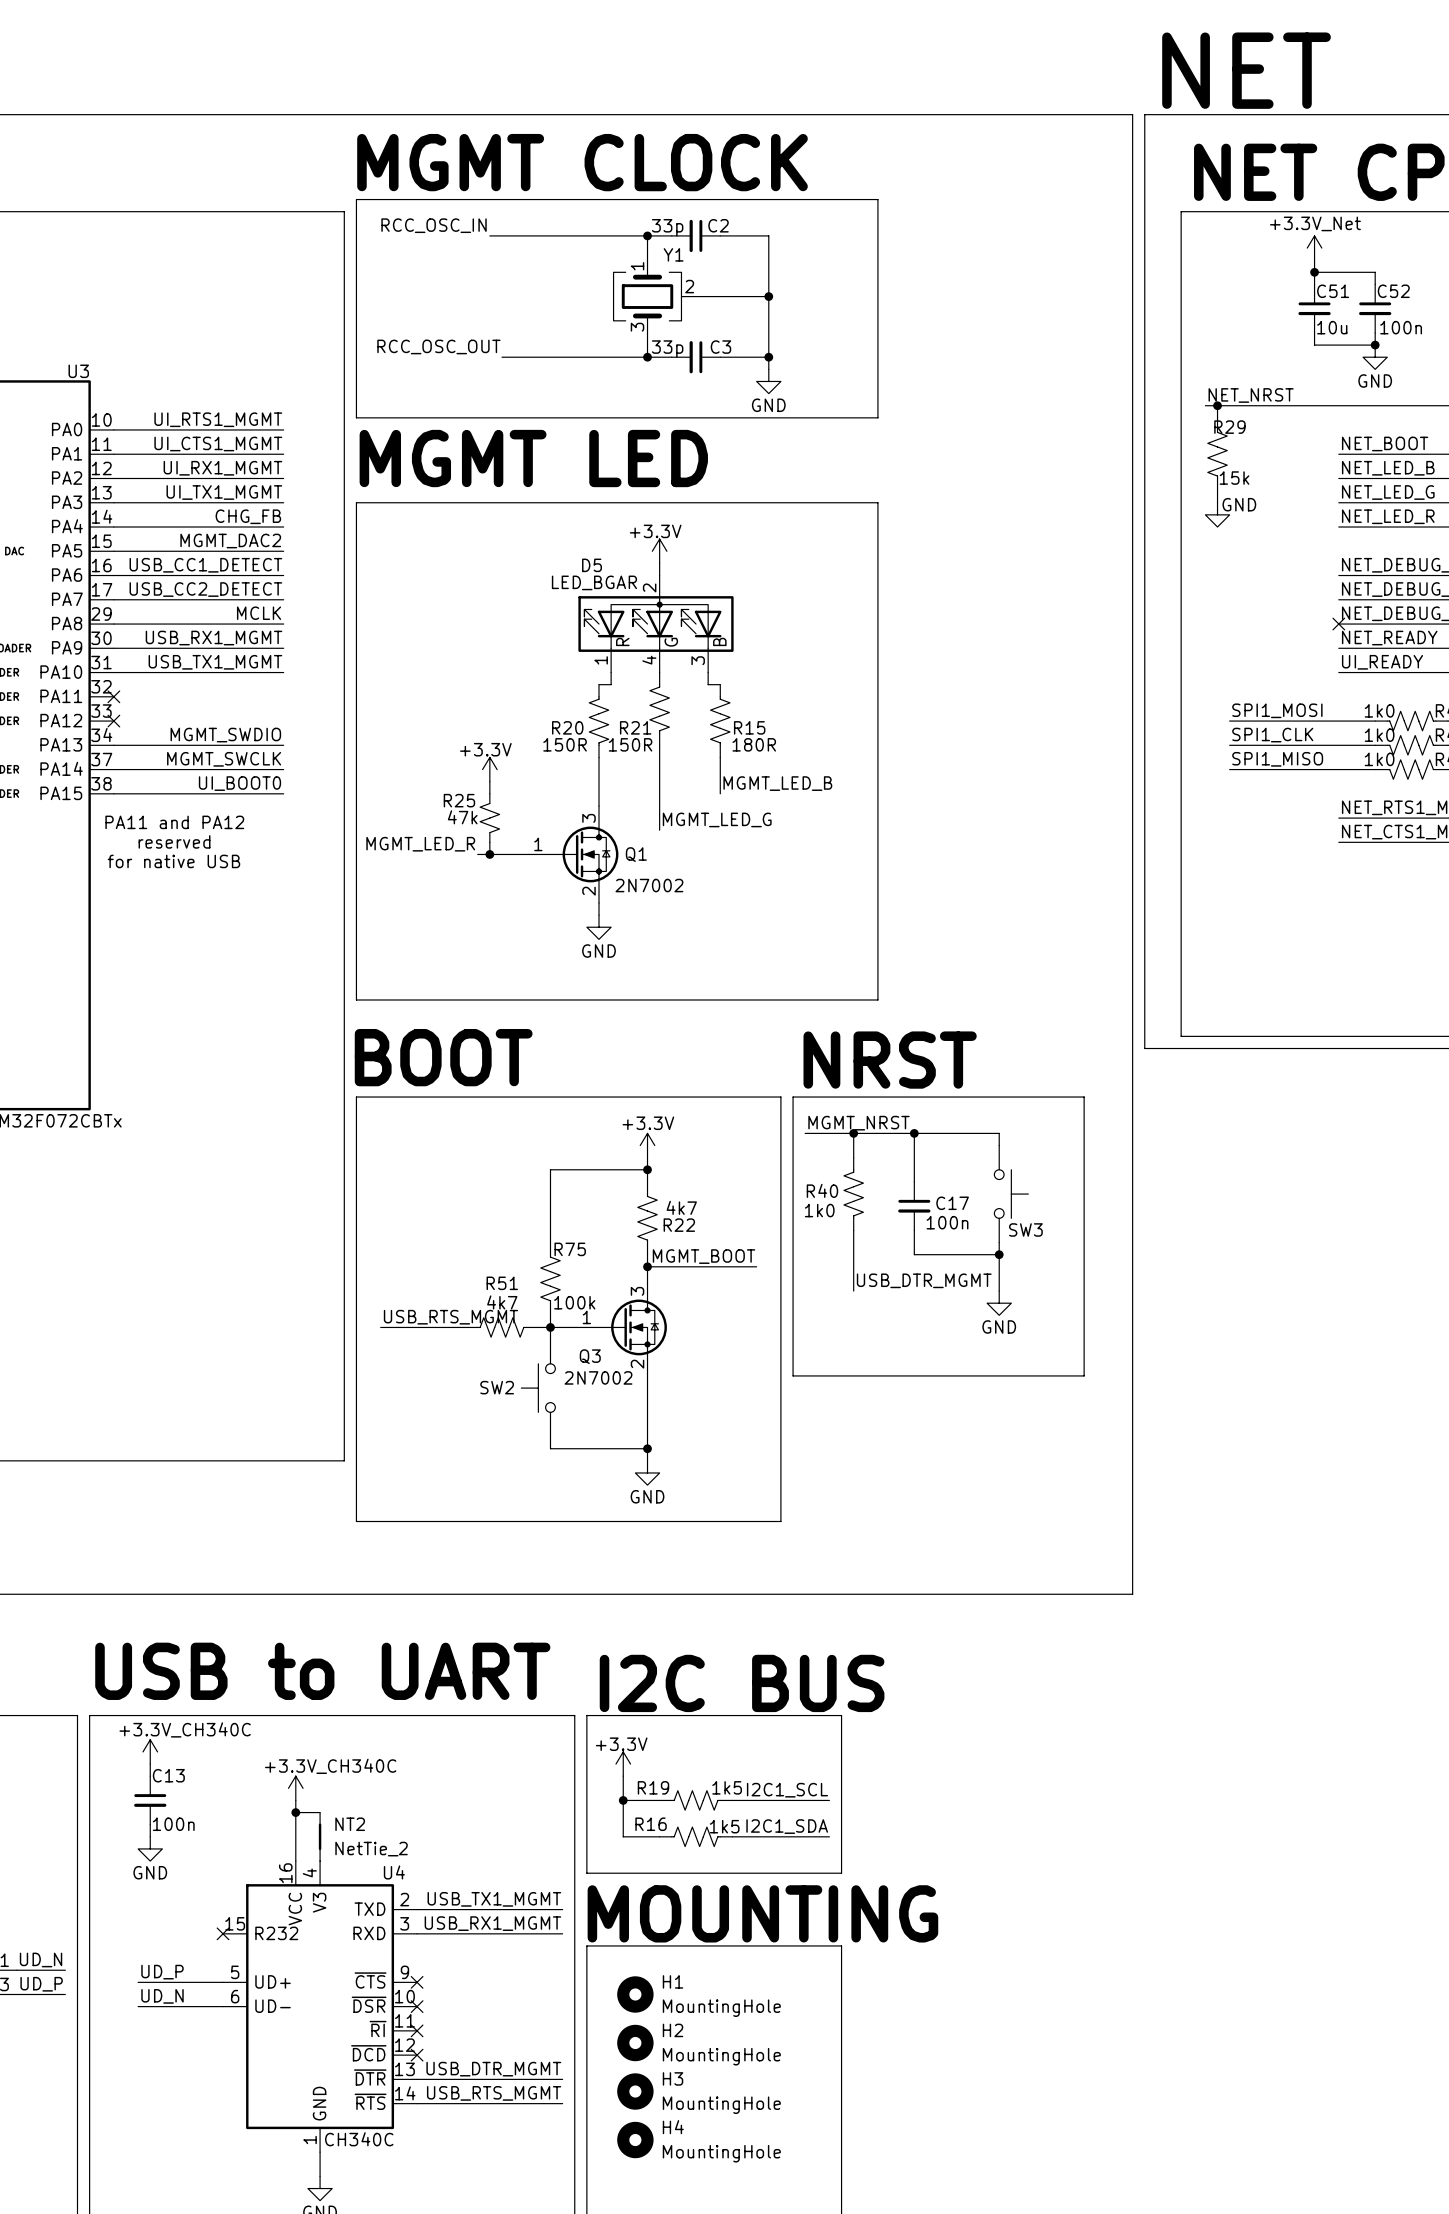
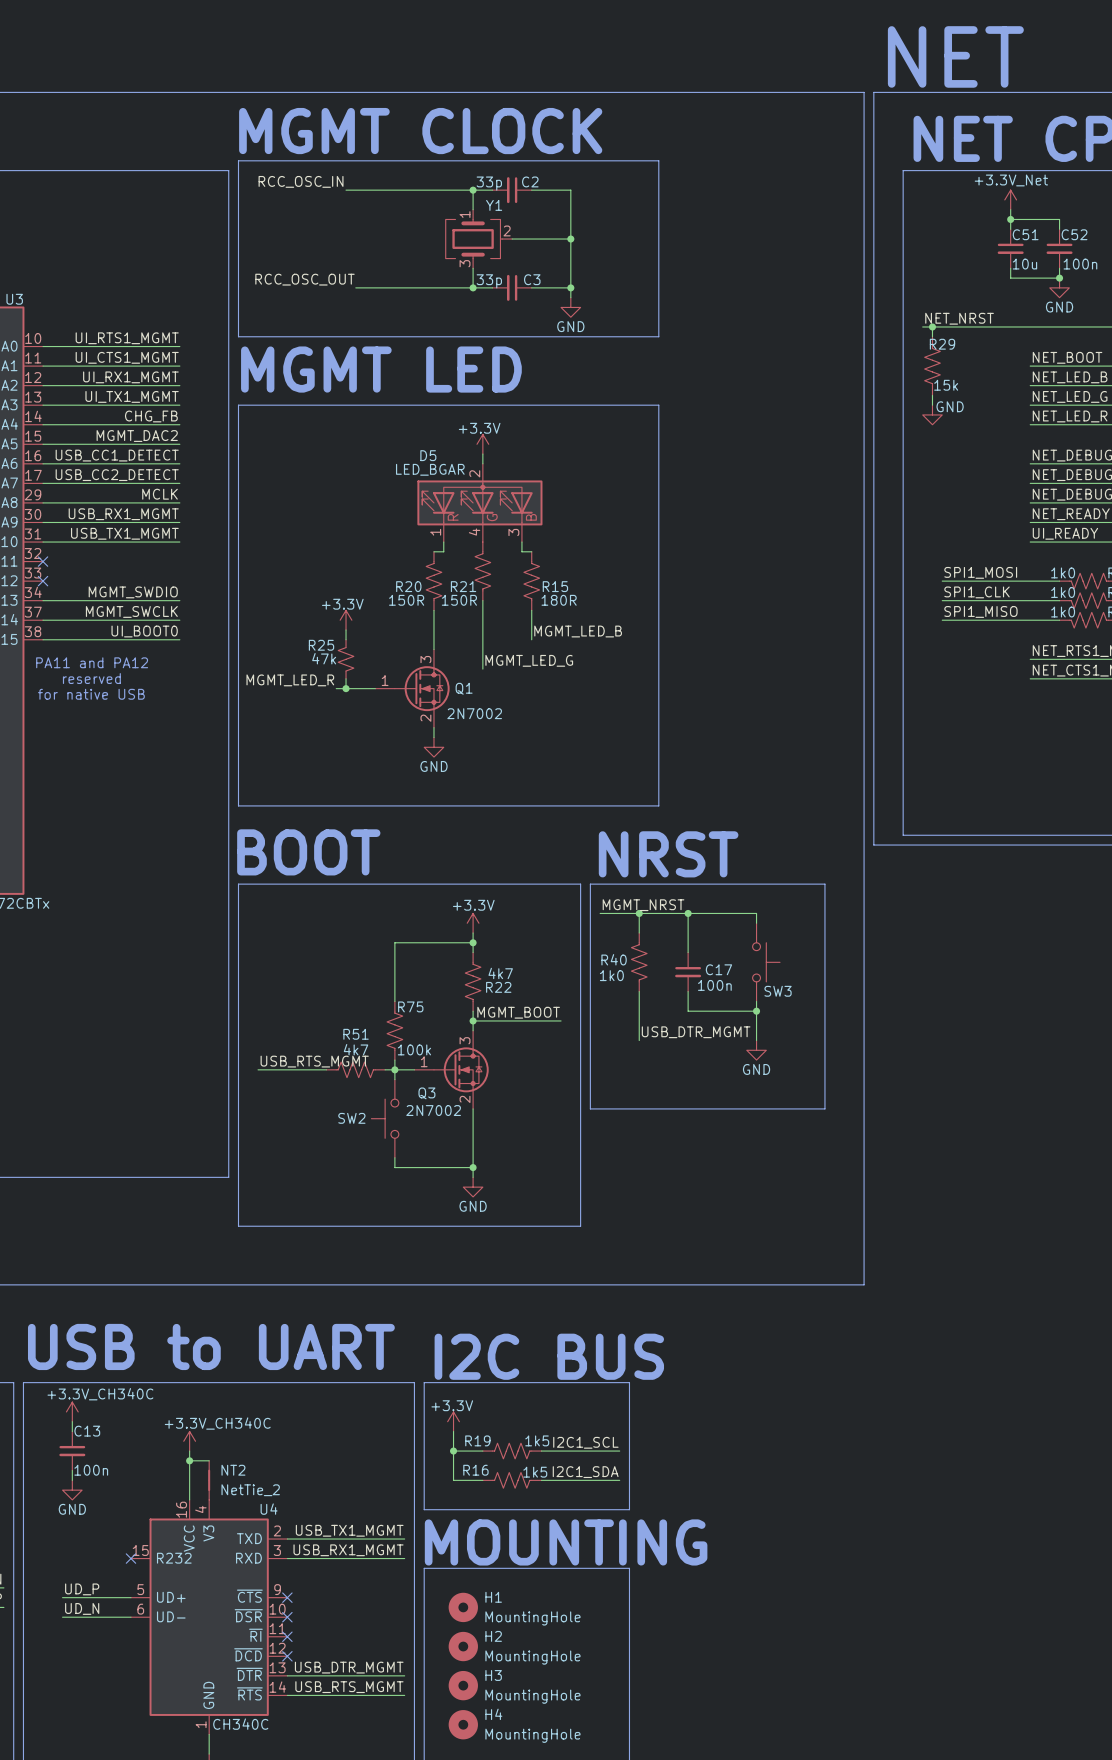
no-connect mark: (1338, 624) -> none

